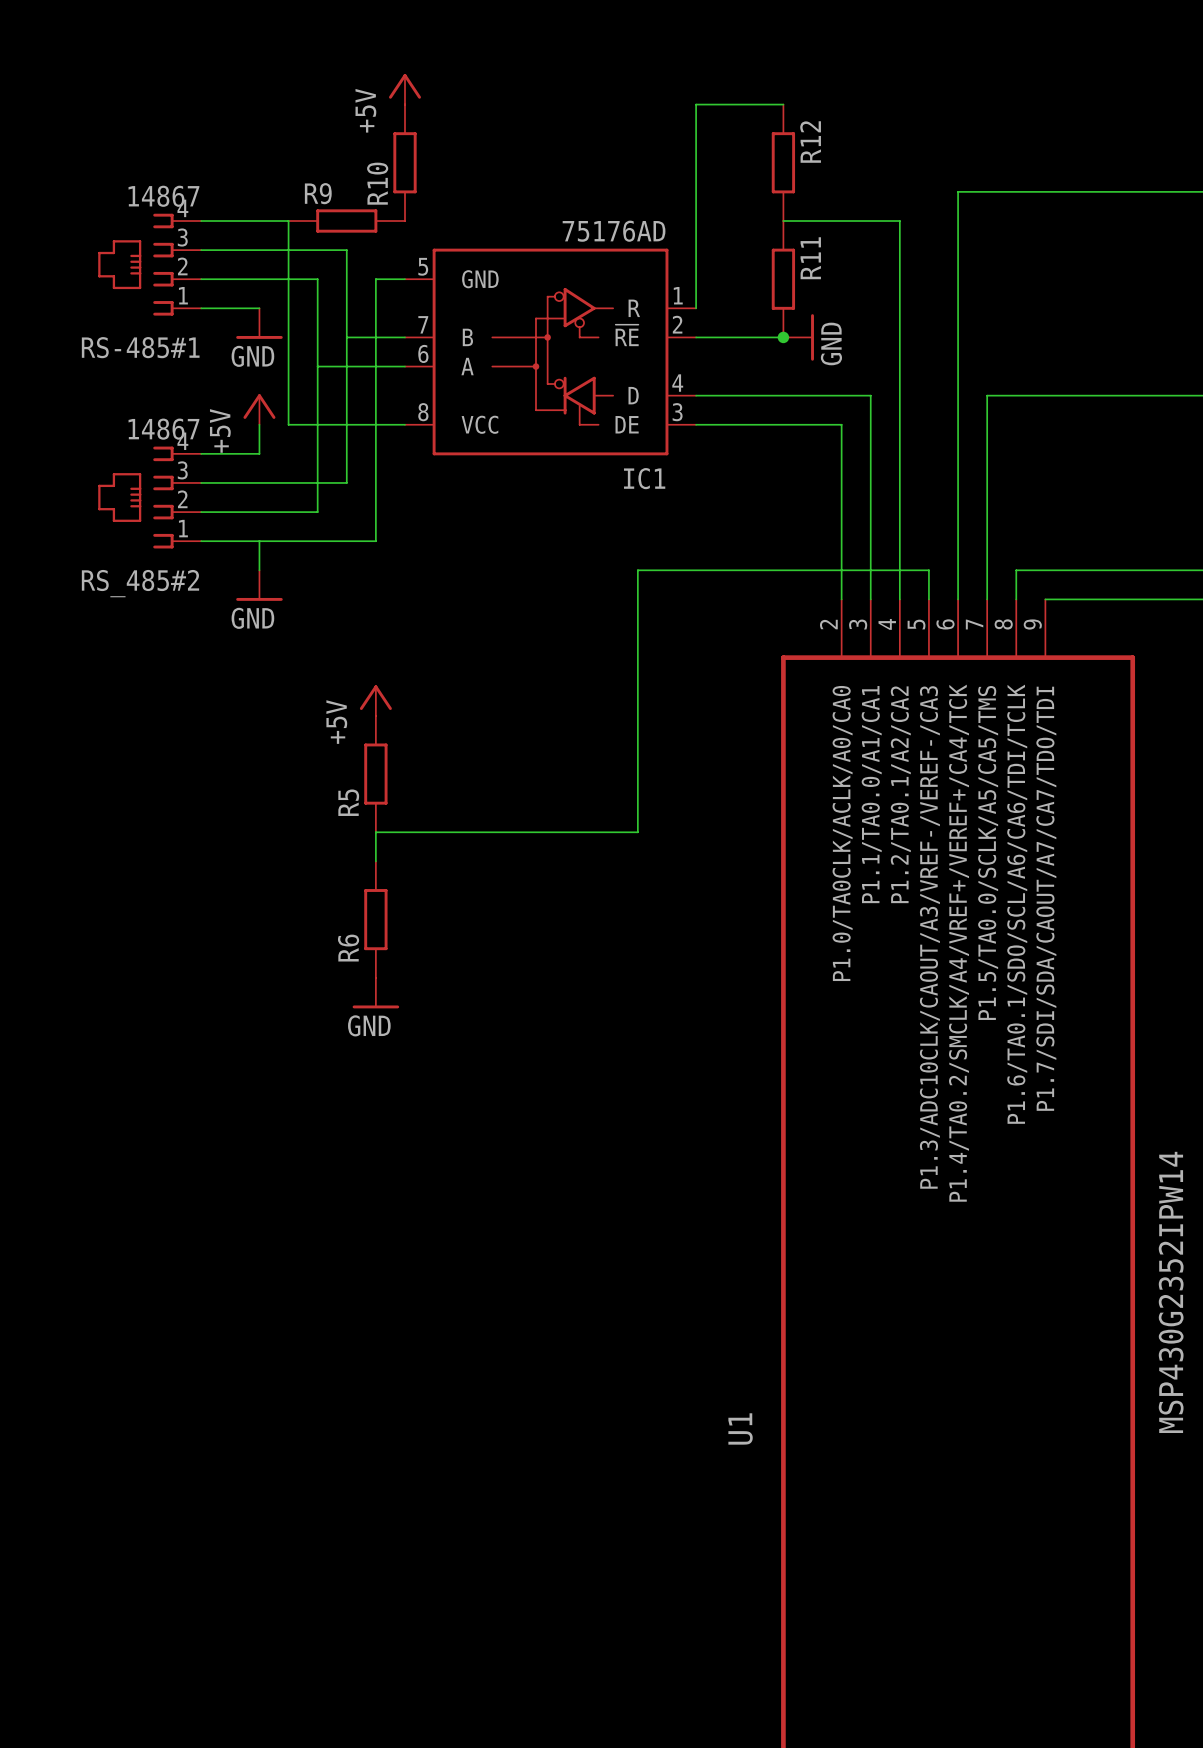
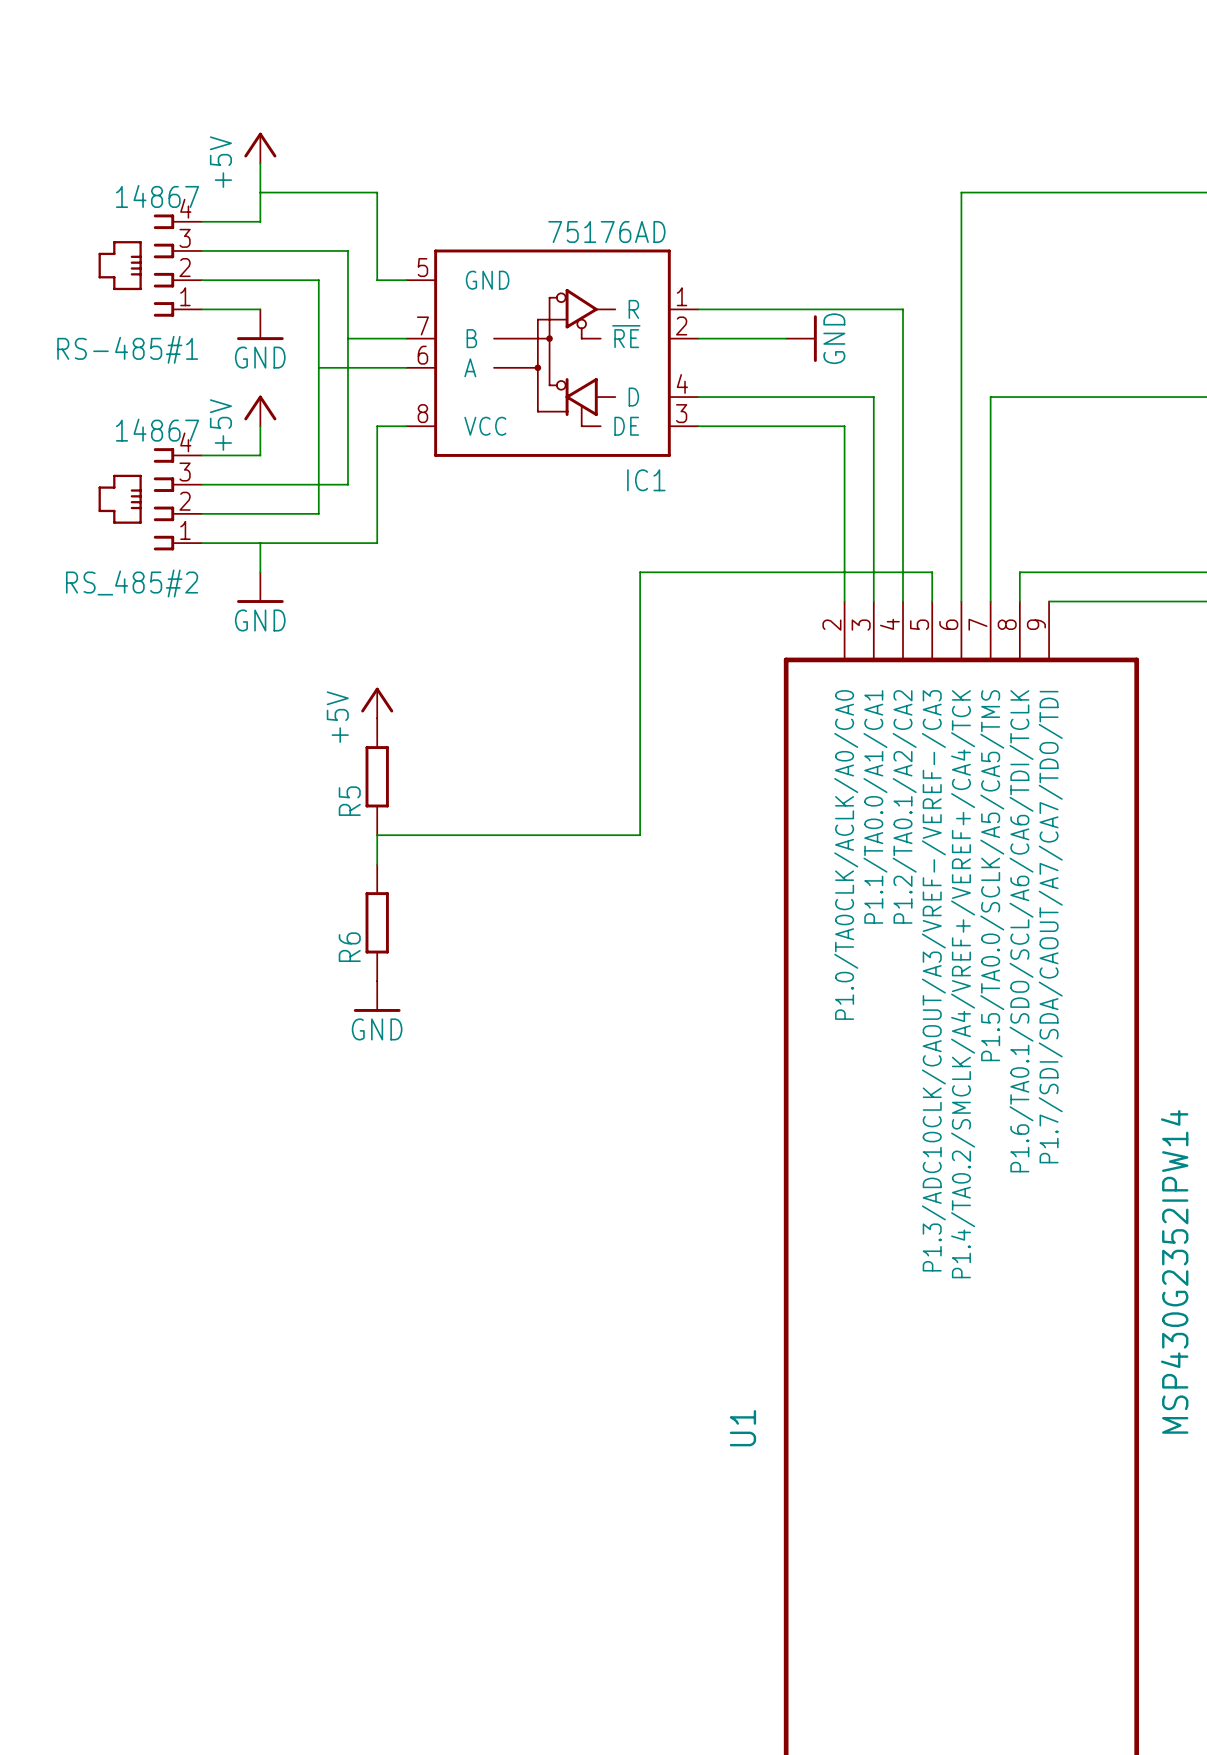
power symbol position: +5V (405, 89) -> +5V (260, 148)
wire: (783, 104) (696, 104) (696, 308) -> none
wire: none -> (260, 163) (260, 221)
R10: (405, 162) -> none
R12: (783, 162) -> none
wire: (259, 221) (288, 221) (288, 424) (375, 424) (375, 279) -> (260, 192) (377, 192) (377, 280)
R9: (346, 221) -> none
wire: (783, 221) (899, 221) (899, 308) -> (698, 309) (903, 309)
R11: (783, 279) -> none
junction: (783, 337) -> none

